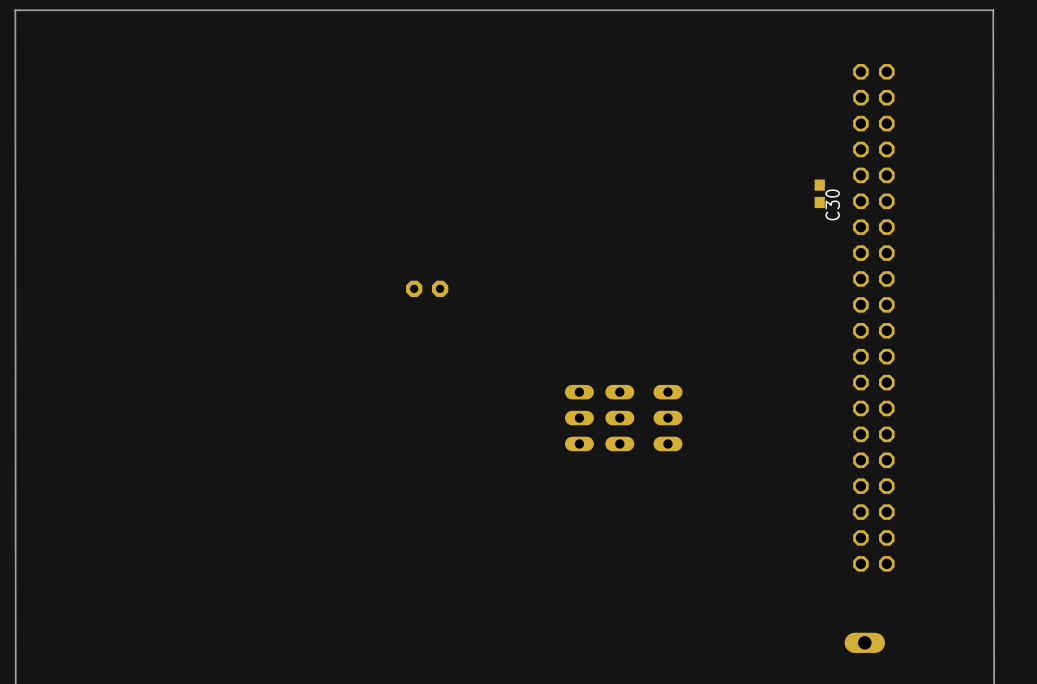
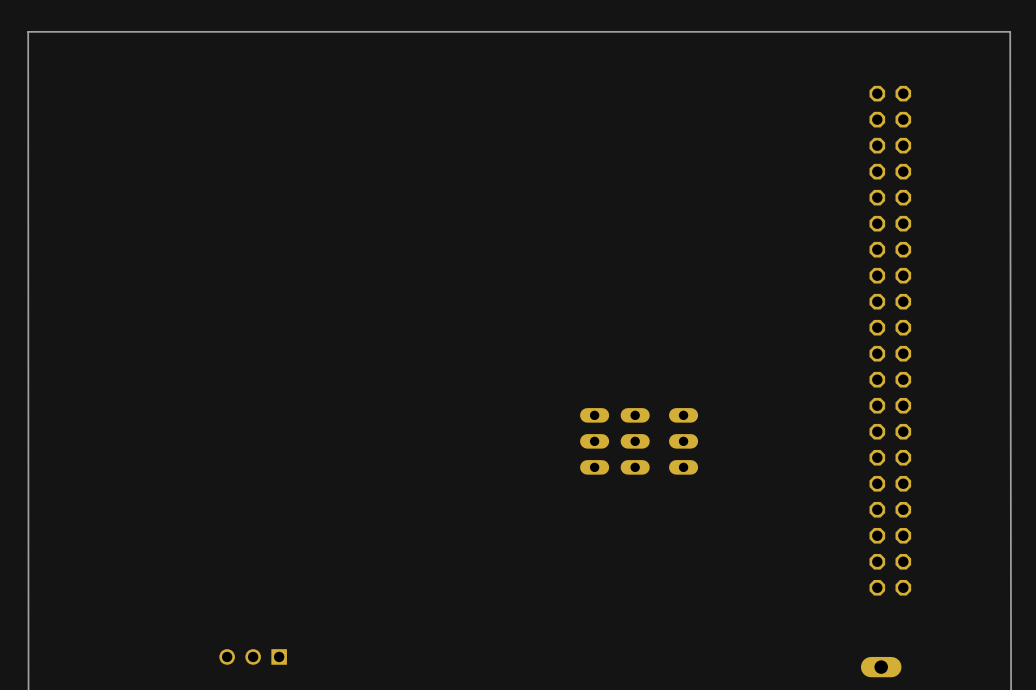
C30: (819, 193) -> none
part: (427, 288) -> none
part: none -> (253, 656)

